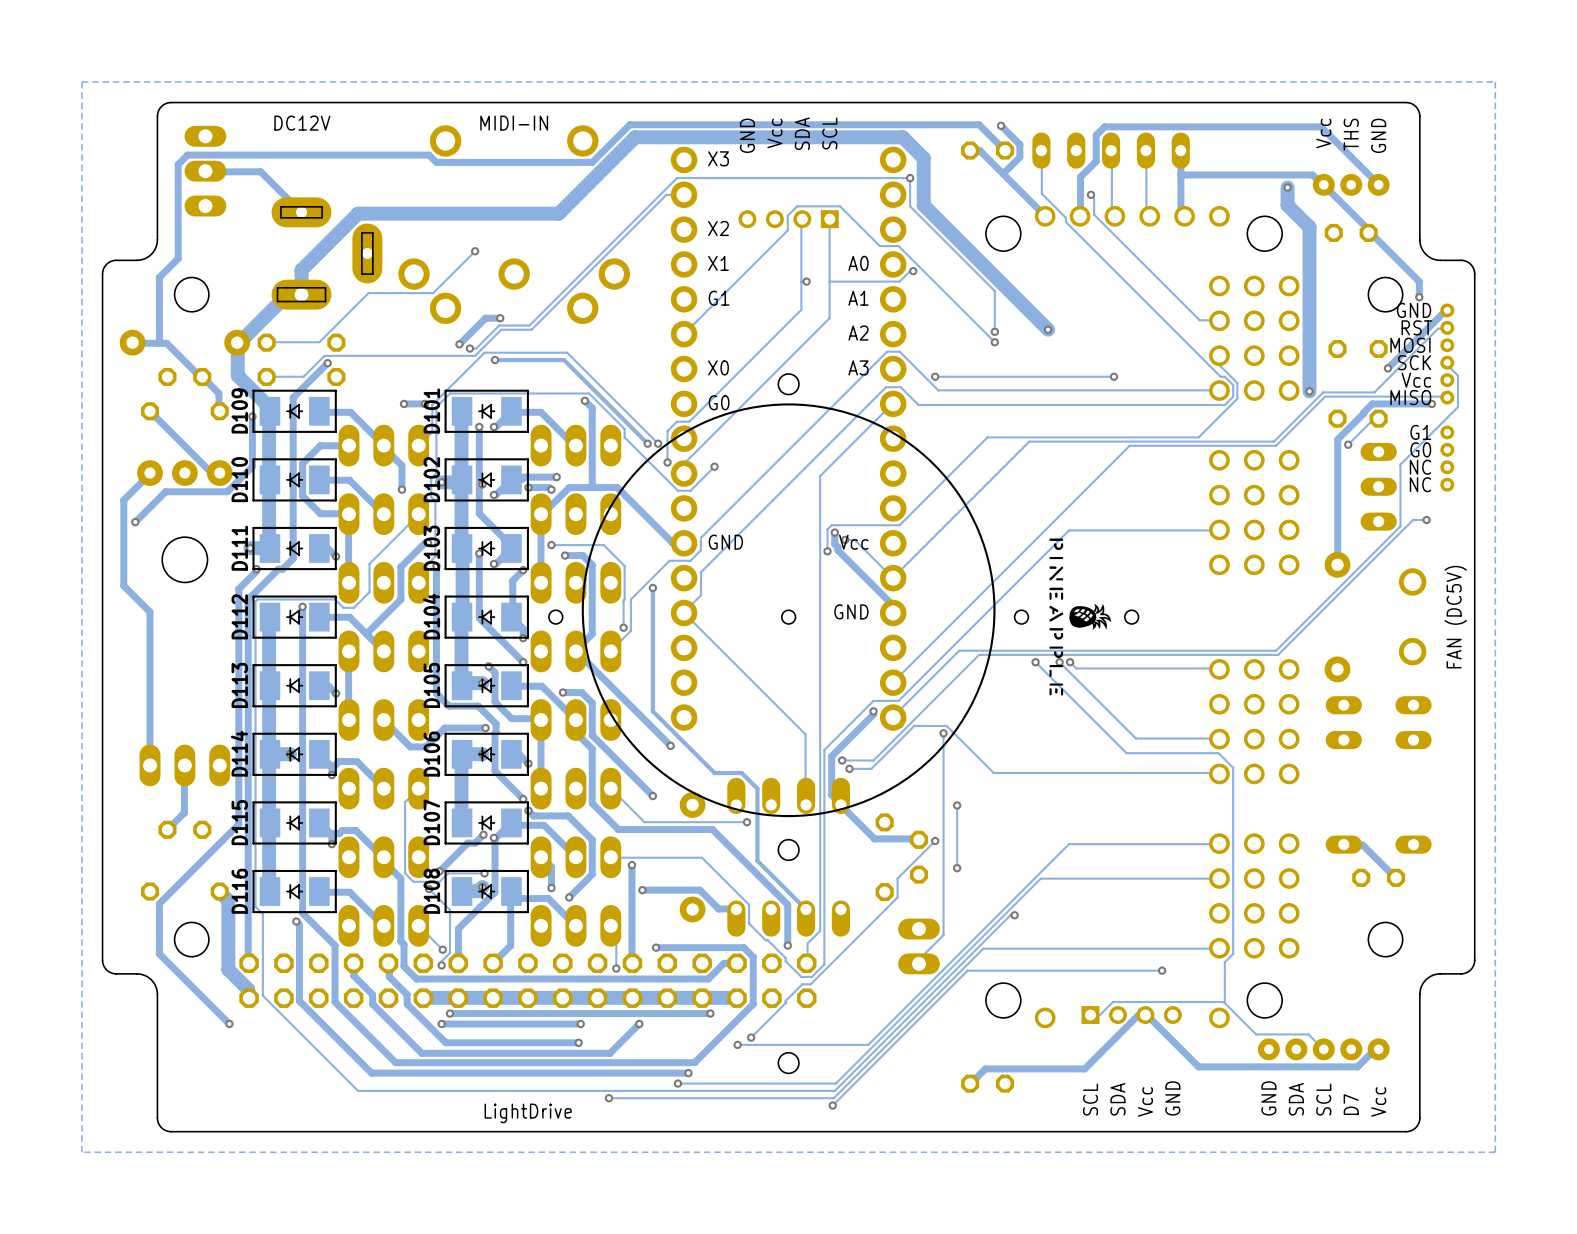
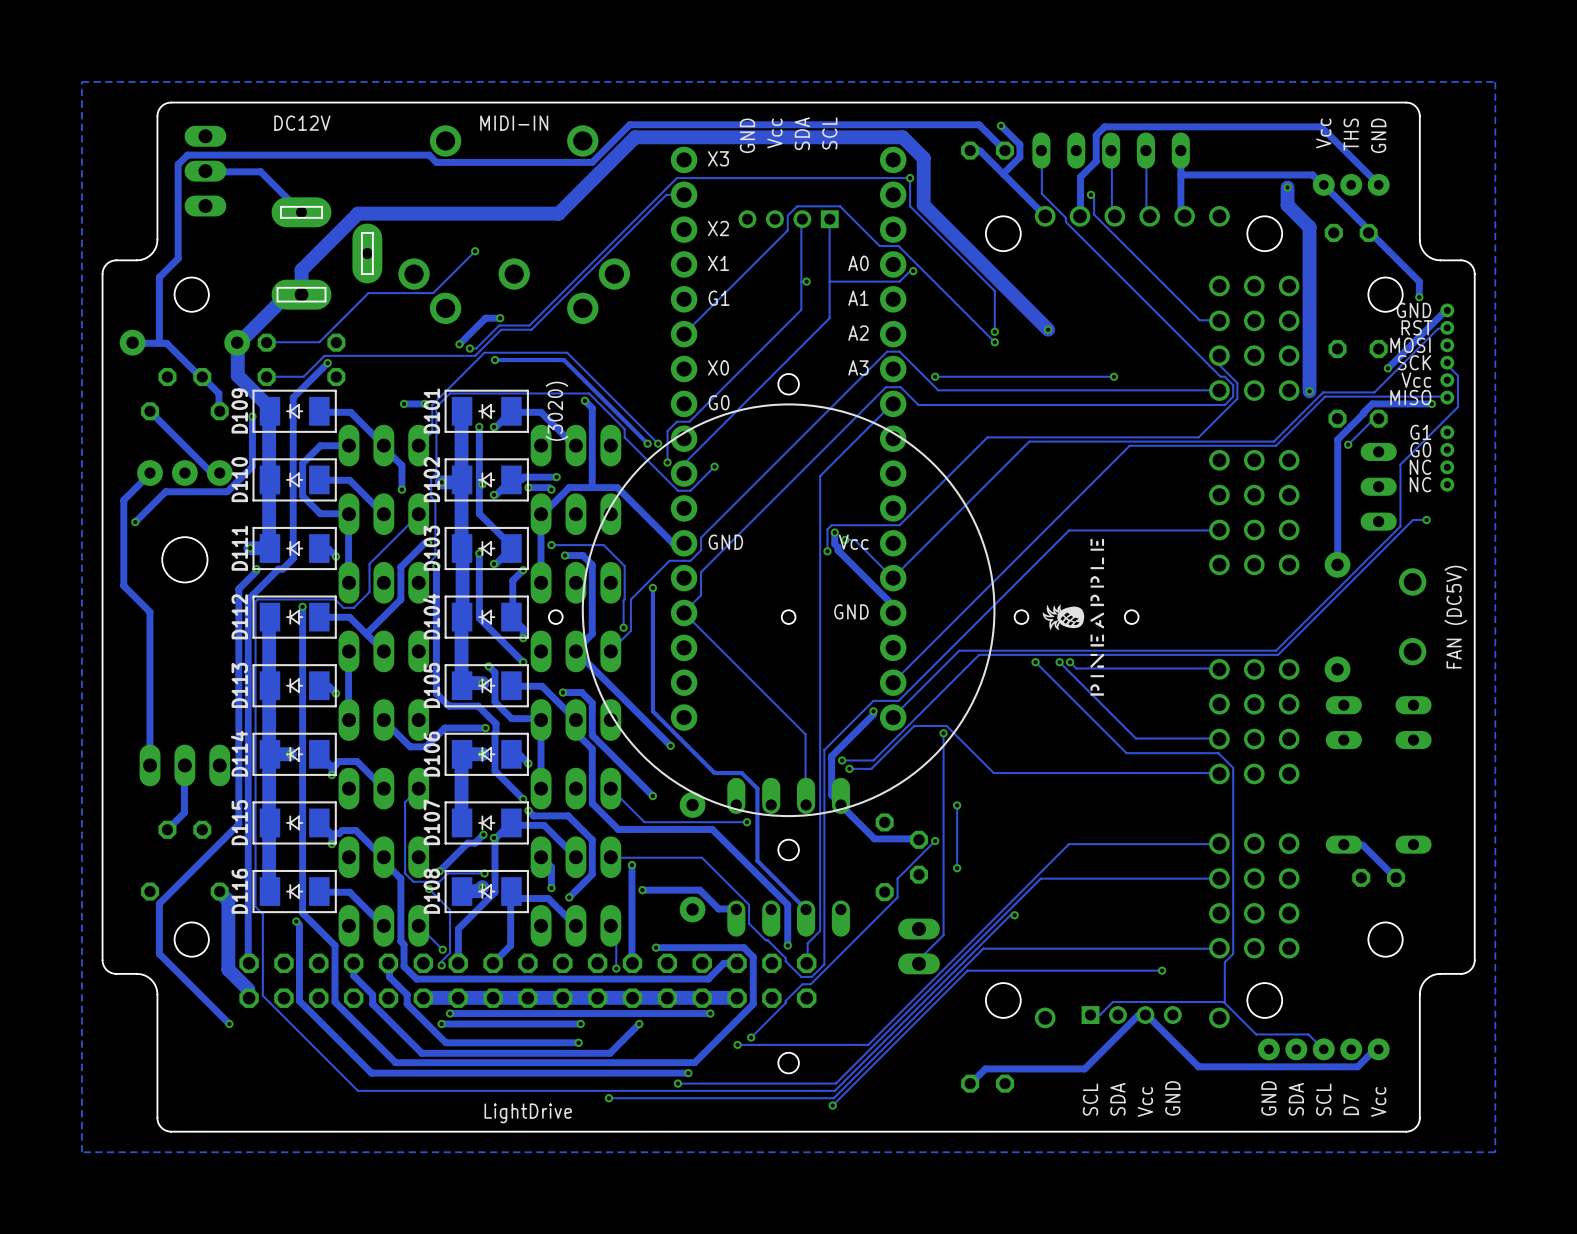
text: none -> (3020) (557, 411)
drawing shape: [1049, 538, 1112, 696] -> [1042, 538, 1105, 696]

